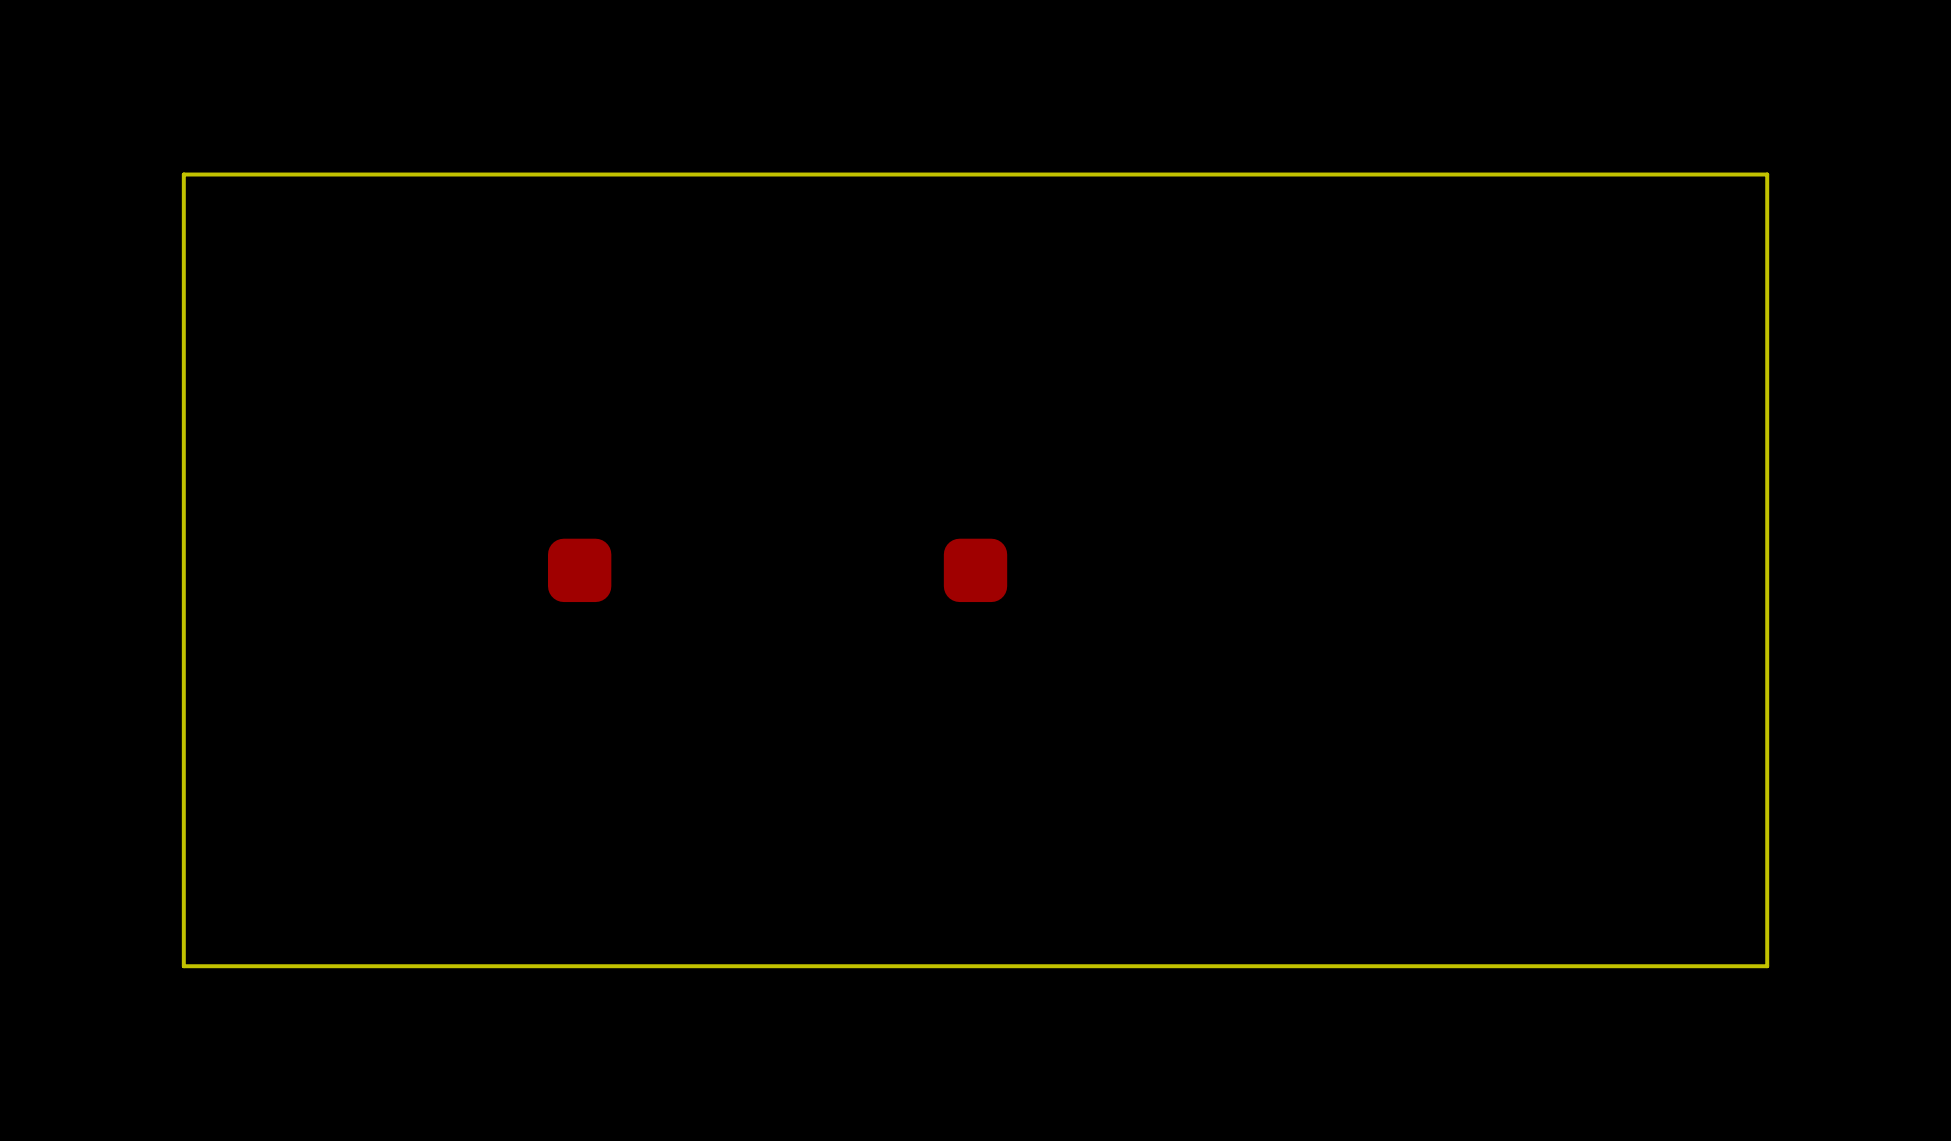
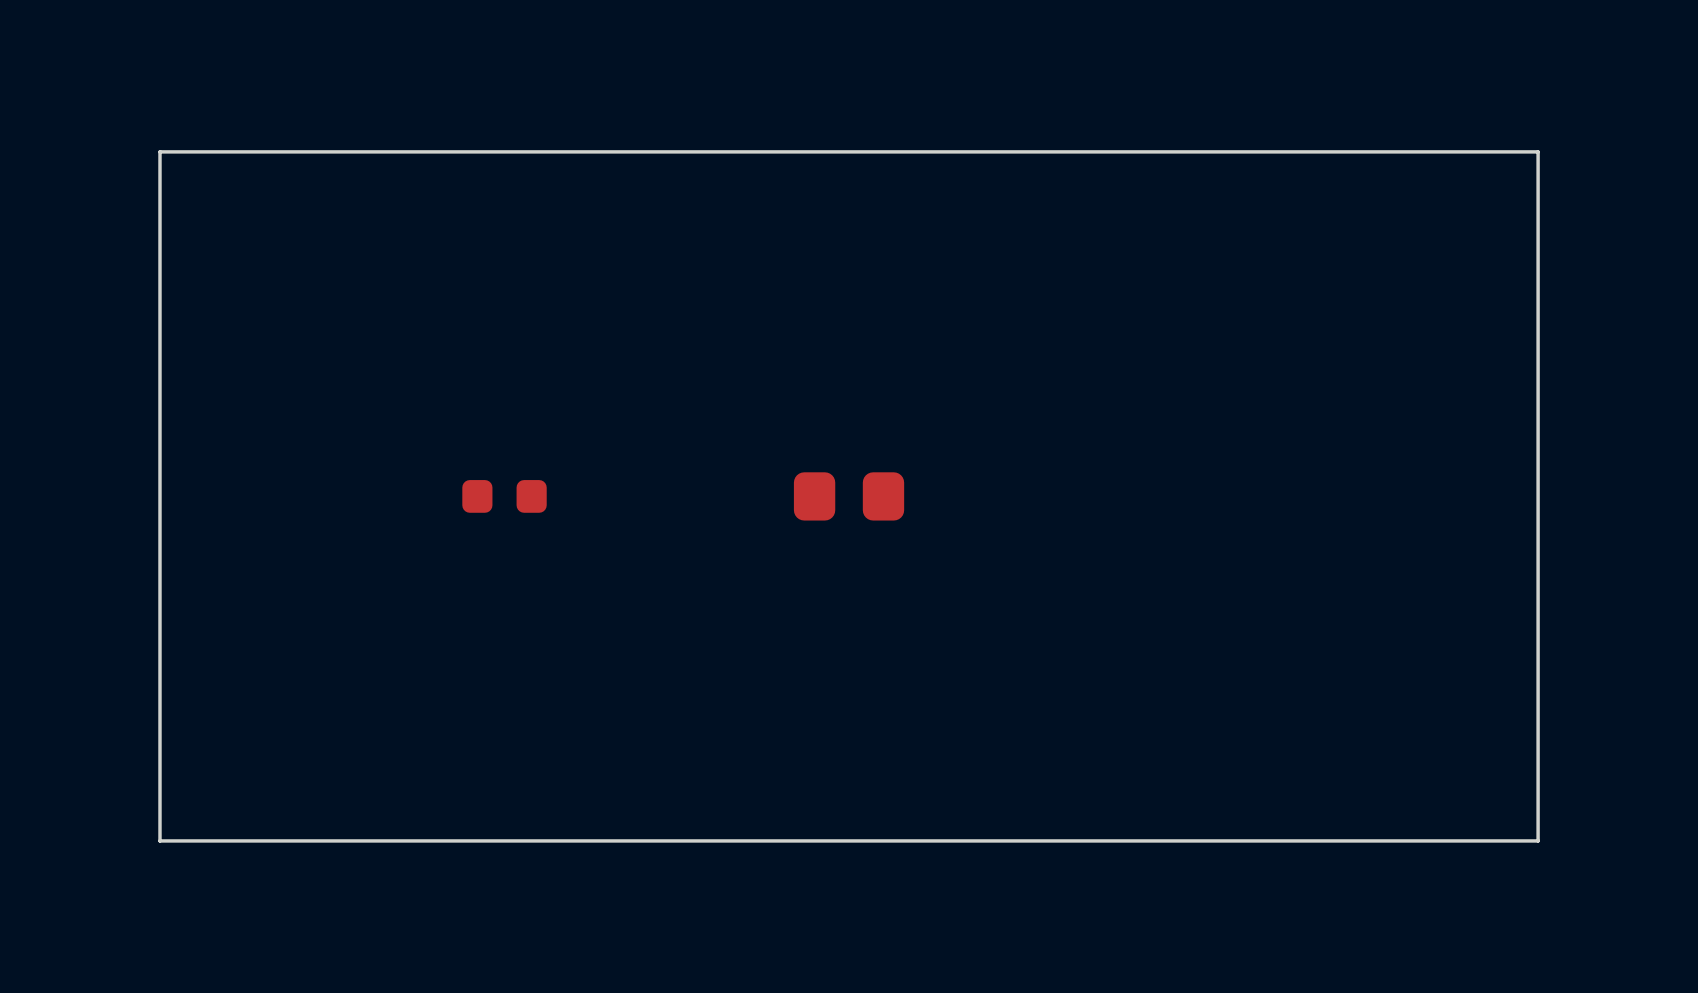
part footprint: [548, 538, 612, 603] -> [462, 480, 547, 513]
part footprint: [943, 538, 1008, 603] -> [793, 472, 905, 521]

